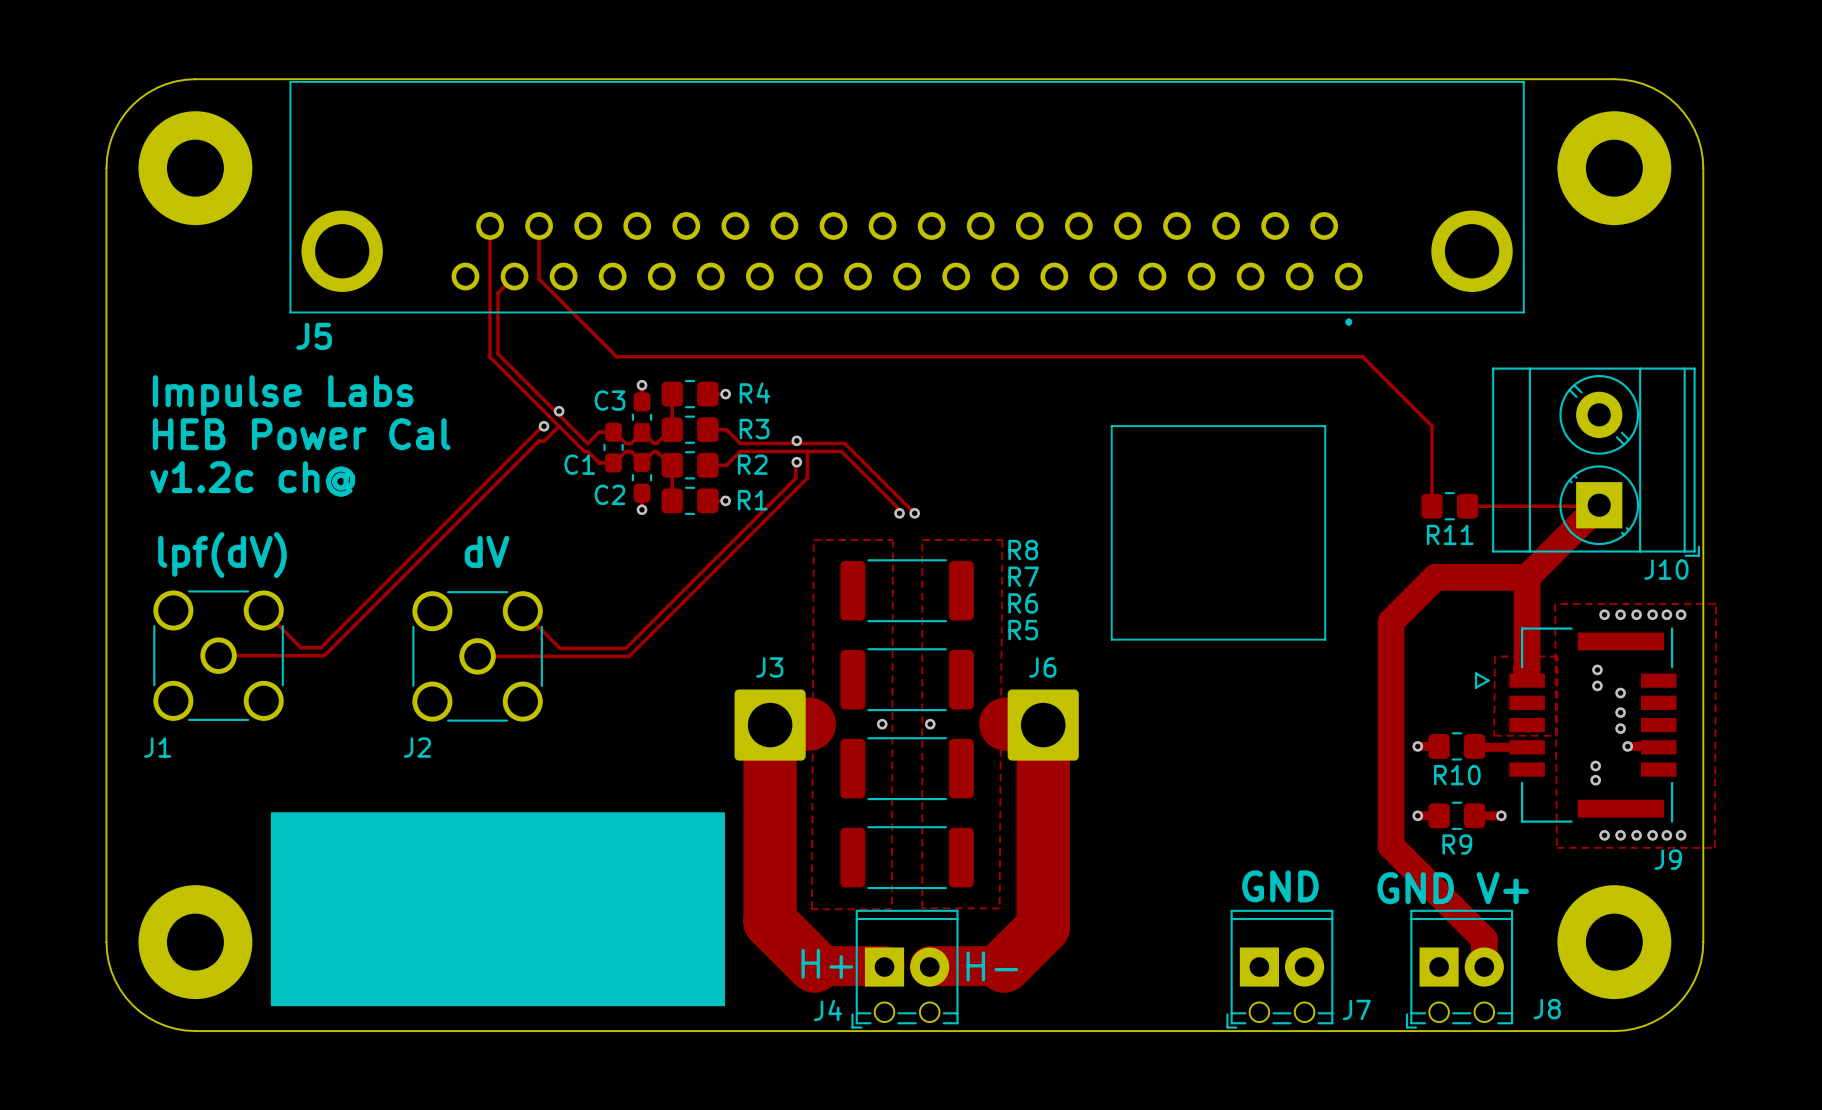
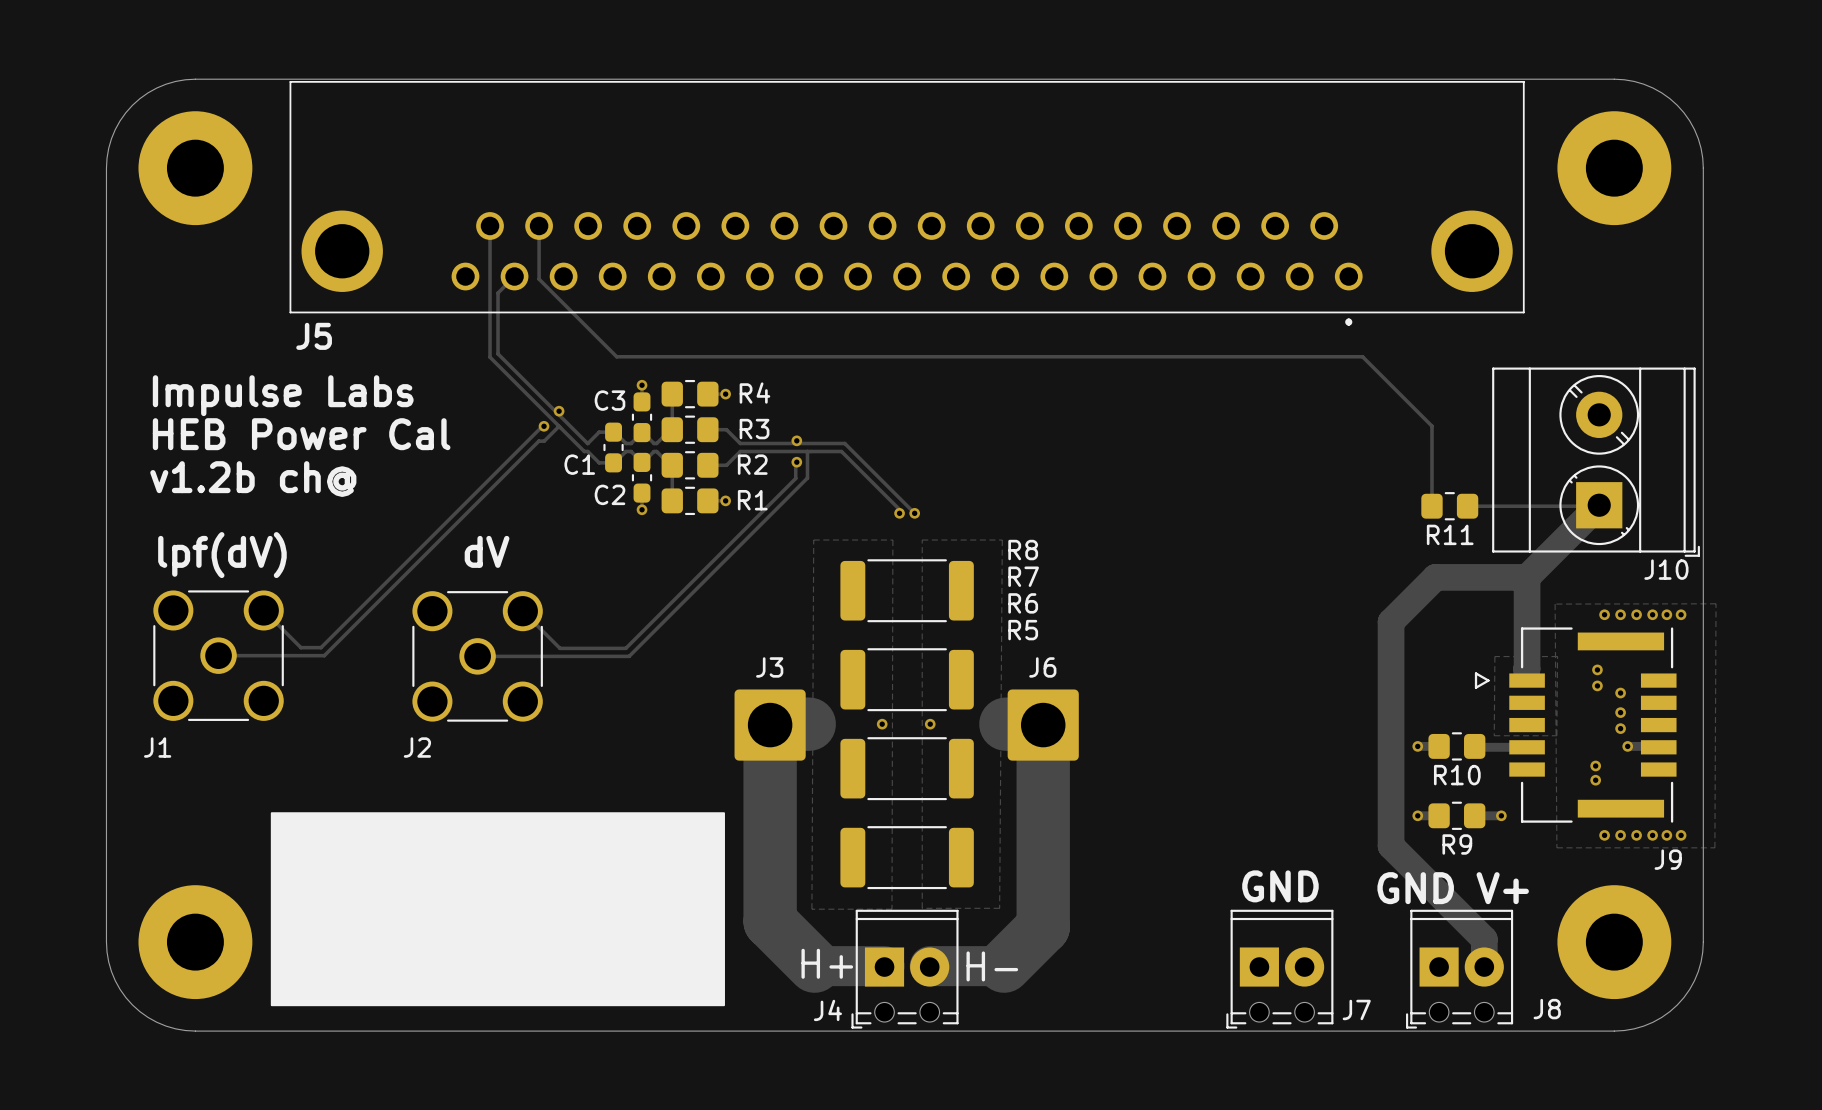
line: (1111, 426) (1325, 426) (1325, 639) (1111, 639) (1111, 426) -> none
text: v1.2c ch@ (252, 479) -> v1.2b ch@ (253, 479)

